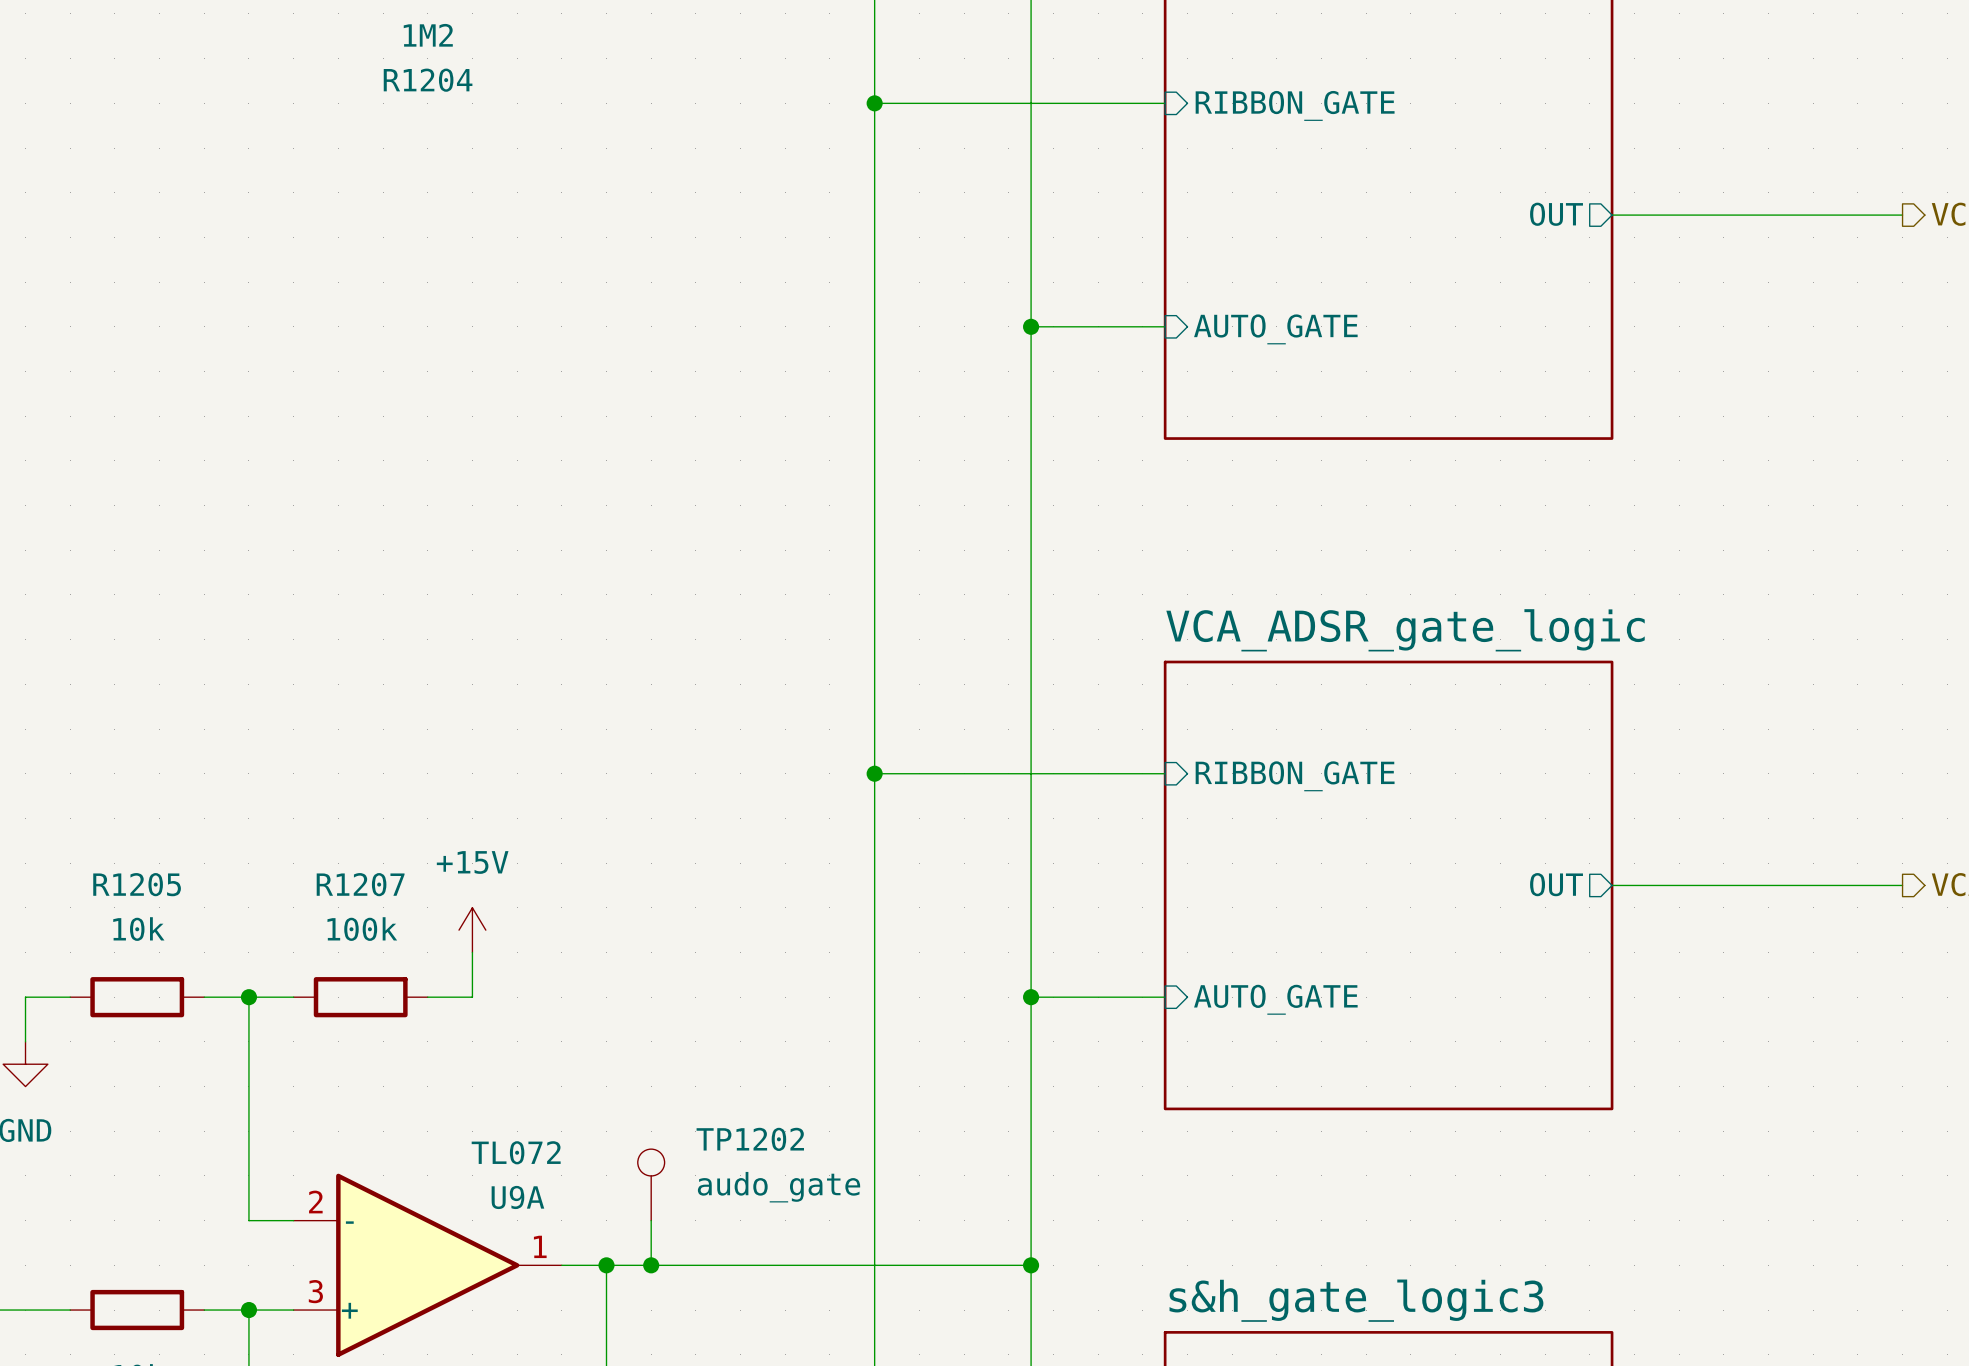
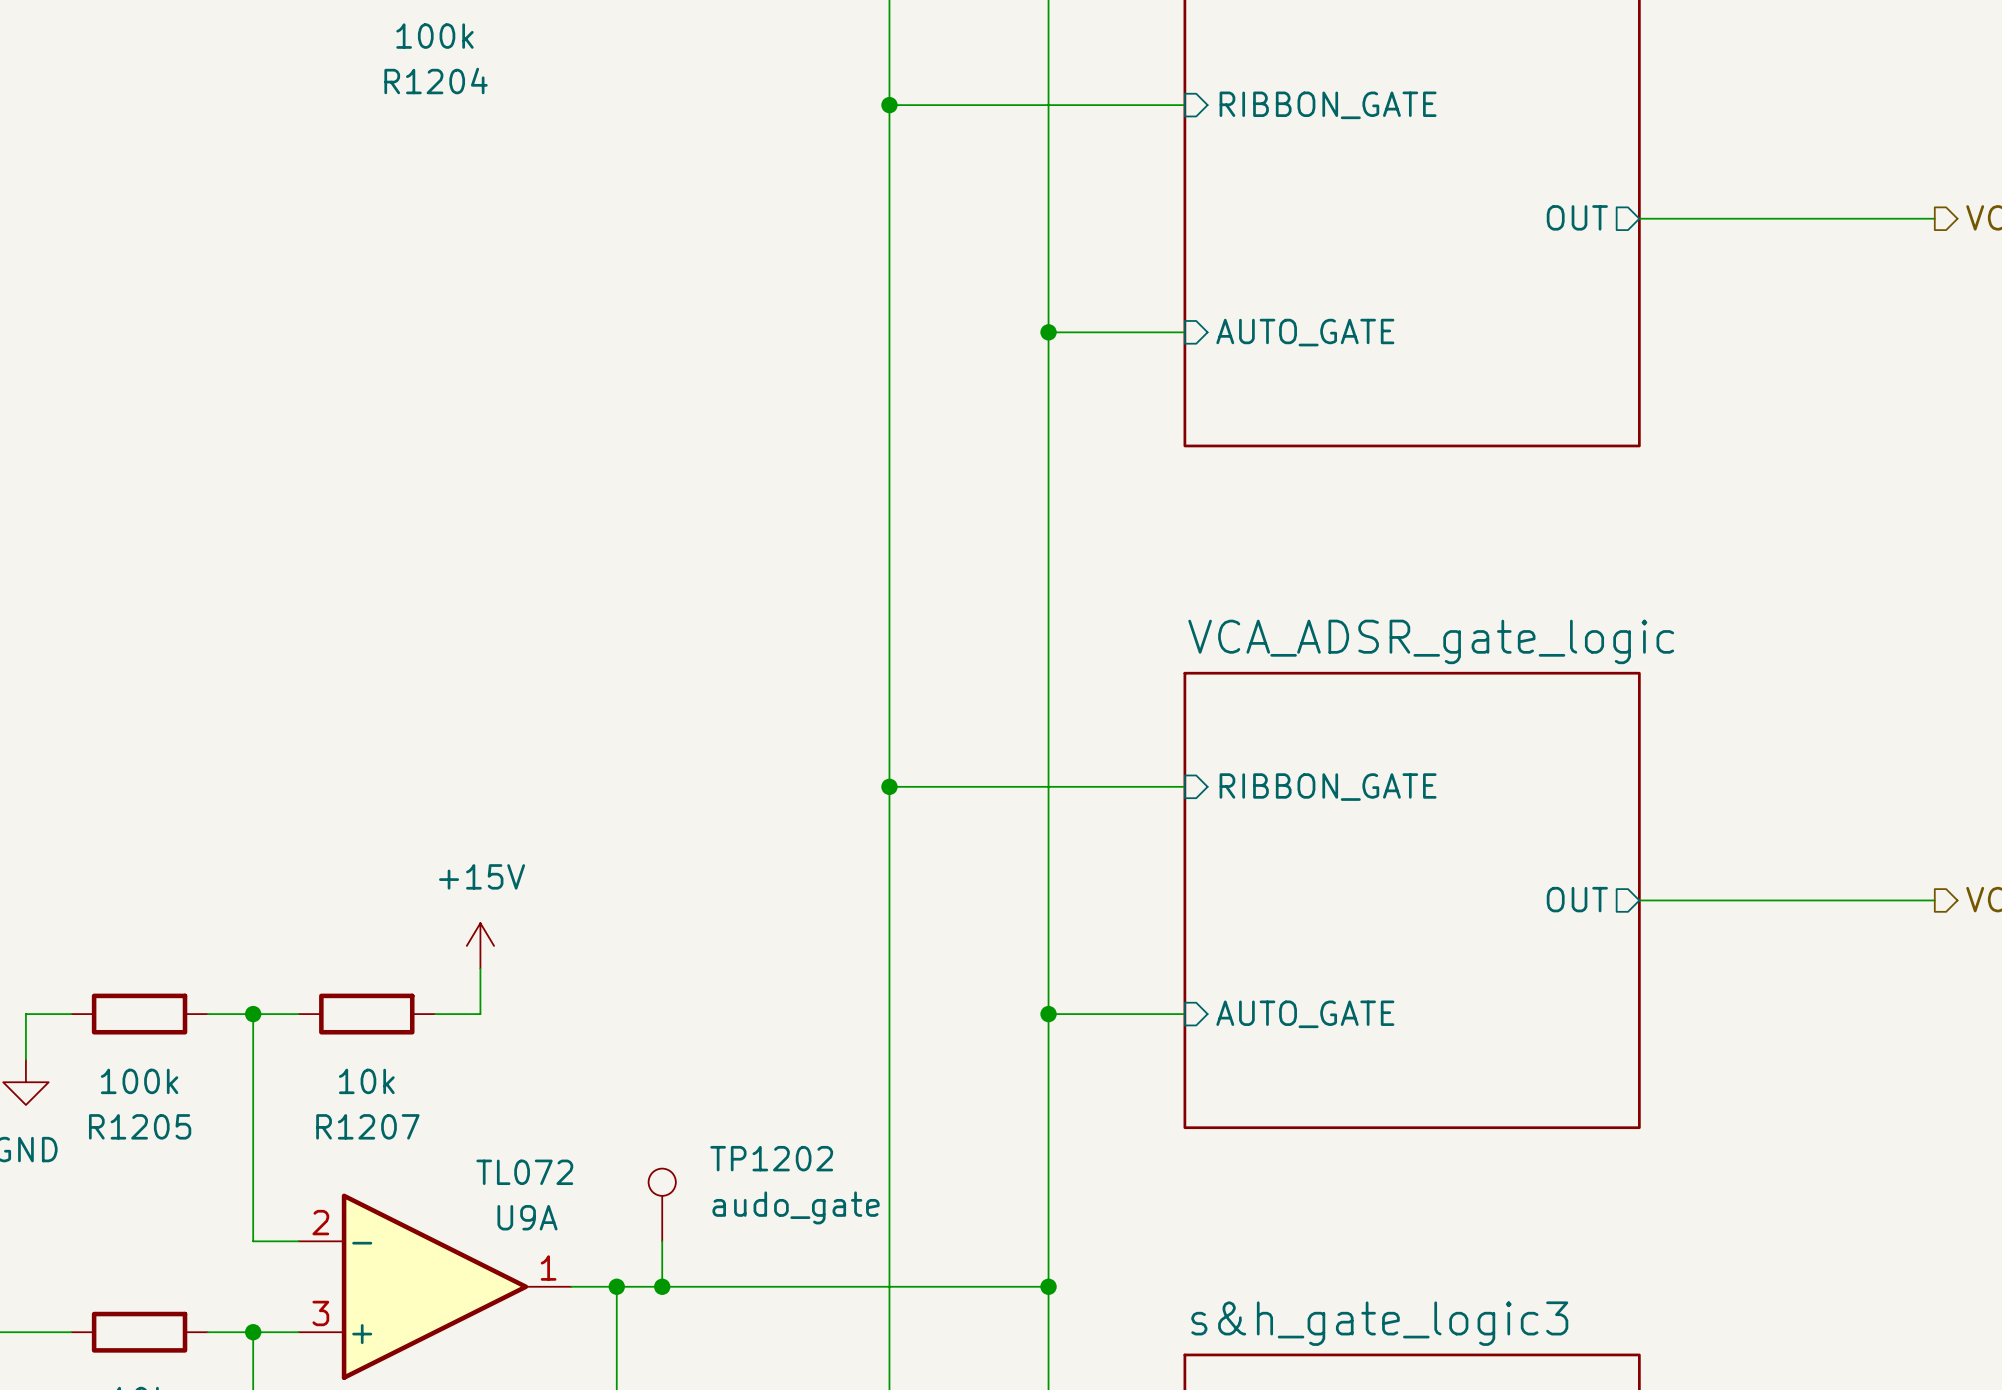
R1204 value: 1M2 (428, 35) -> 100k (434, 36)
R1205 name position: R1205 (137, 884) -> R1205 (140, 1126)
R1207 name position: R1207 (360, 884) -> R1207 (367, 1126)
R1205 value: 10k (138, 929) -> 100k (139, 1081)
R1207 value: 100k (362, 929) -> 10k (366, 1081)

